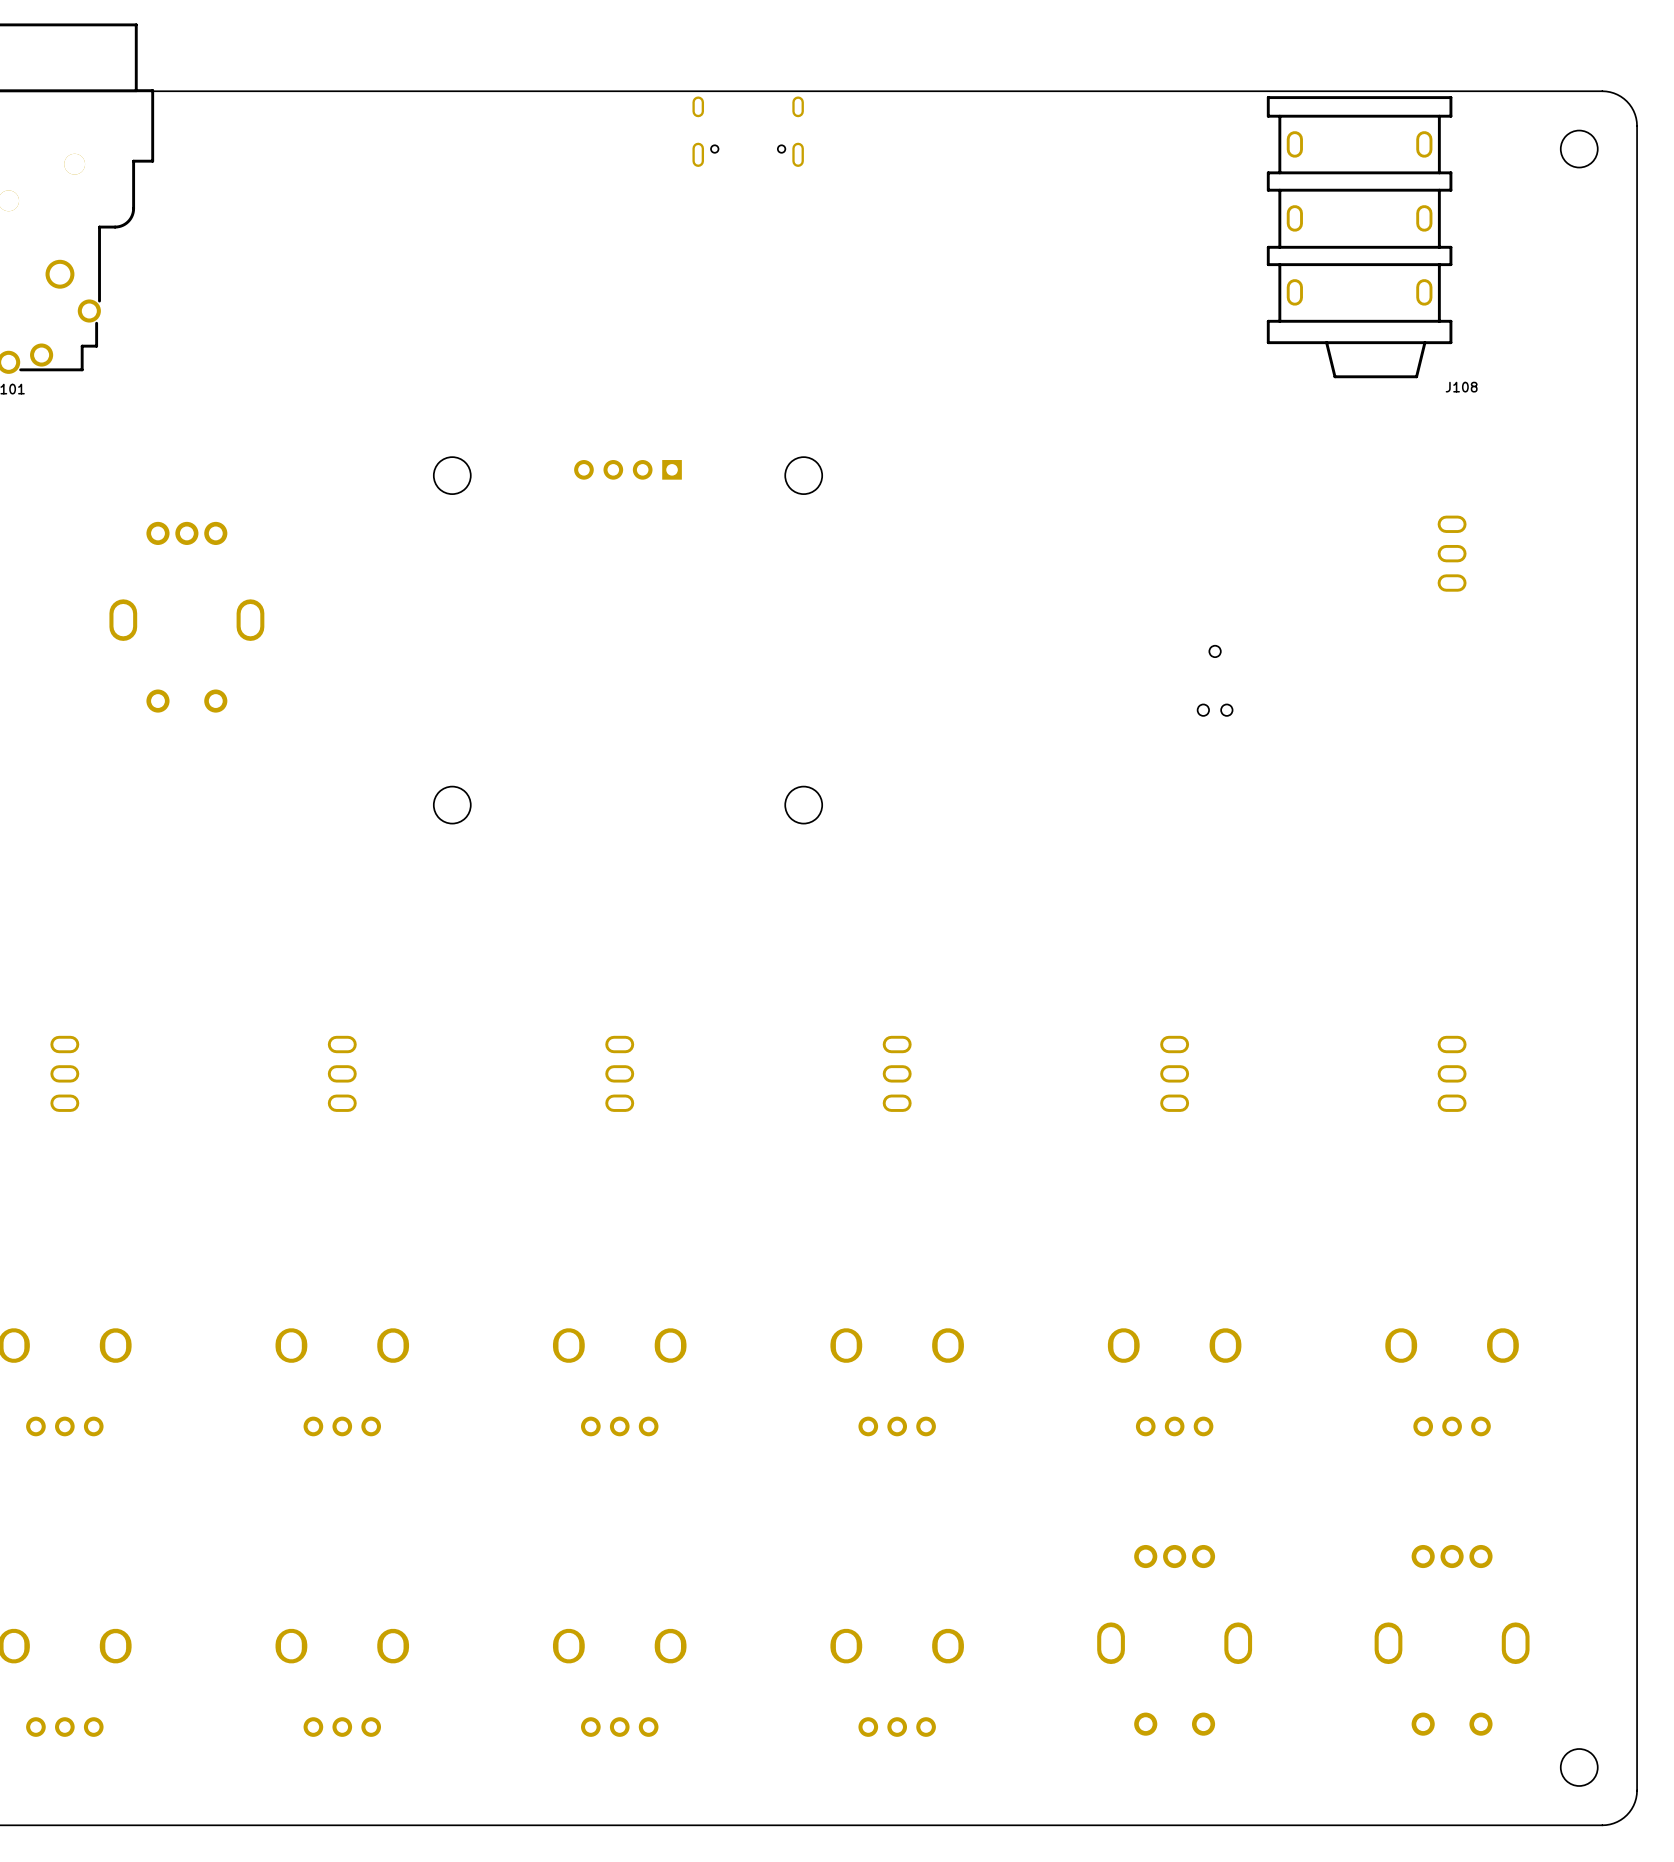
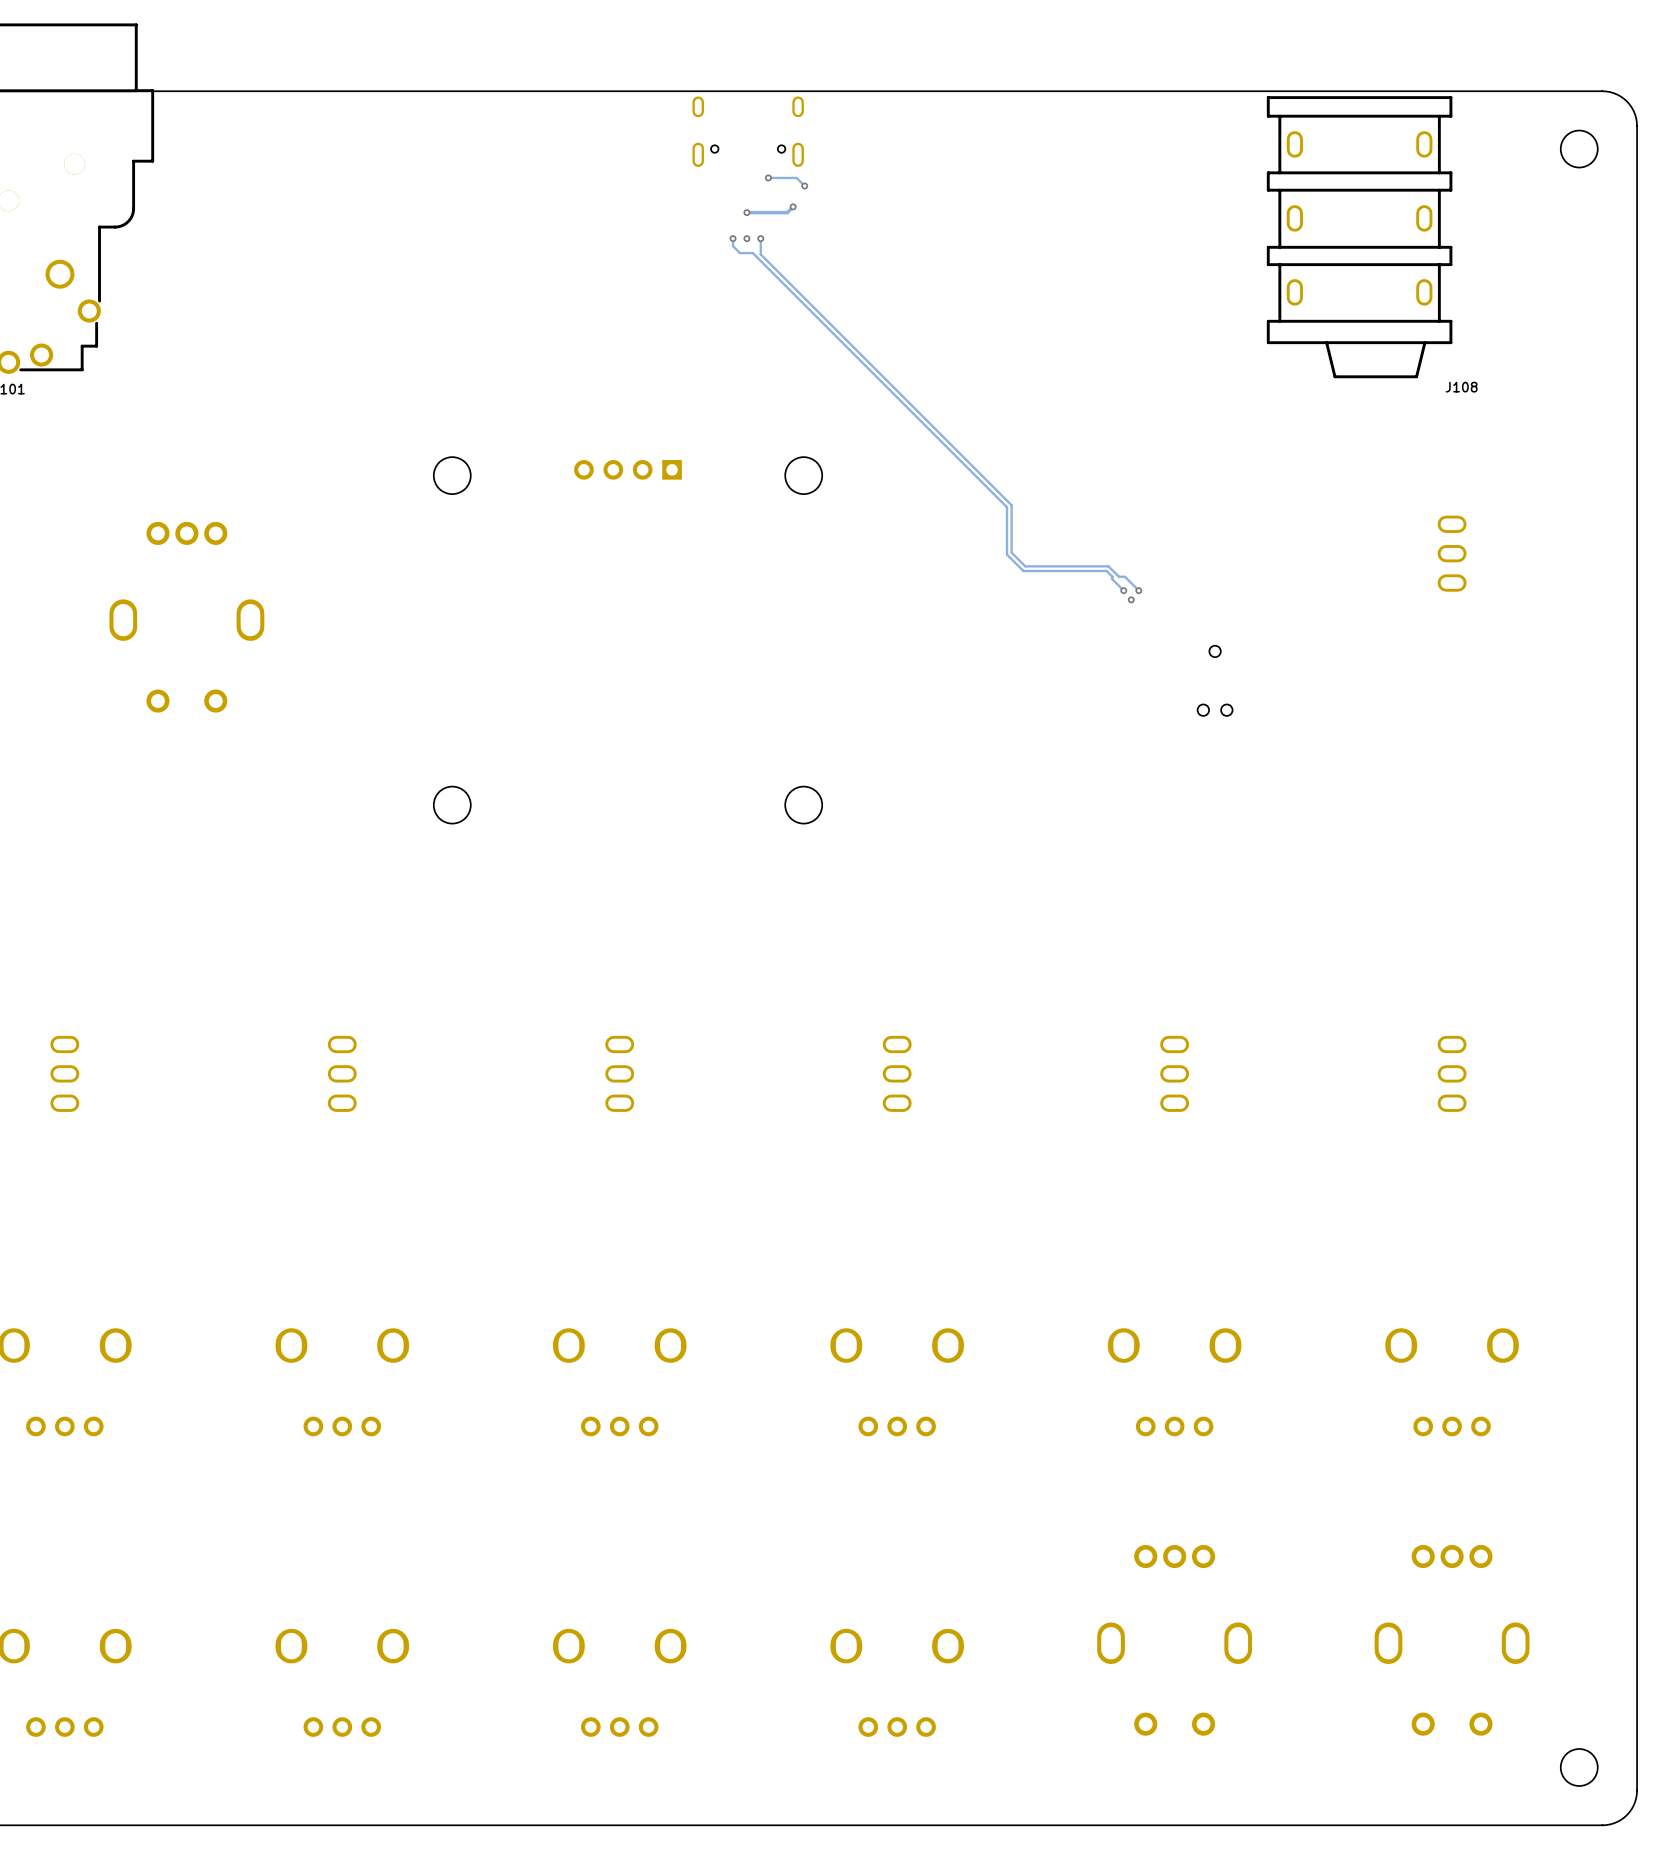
track: none -> (768, 177) (796, 177) (804, 186)
via: none -> (768, 177)
via: none -> (804, 186)
track: none -> (793, 206) (787, 212) (746, 212)
via: none -> (793, 206)
via: none -> (746, 212)
track: none -> (733, 238) (733, 246) (739, 253) (752, 253) (1007, 507) (1007, 554) (1023, 571) (1106, 571) (1123, 590)
via: none -> (733, 238)
via: none -> (746, 238)
track: none -> (760, 238) (760, 254) (1011, 505) (1011, 552) (1025, 566) (1108, 566) (1118, 576) (1124, 576) (1138, 590)
via: none -> (760, 238)
via: none -> (1123, 590)
via: none -> (1138, 590)
via: none -> (1131, 599)

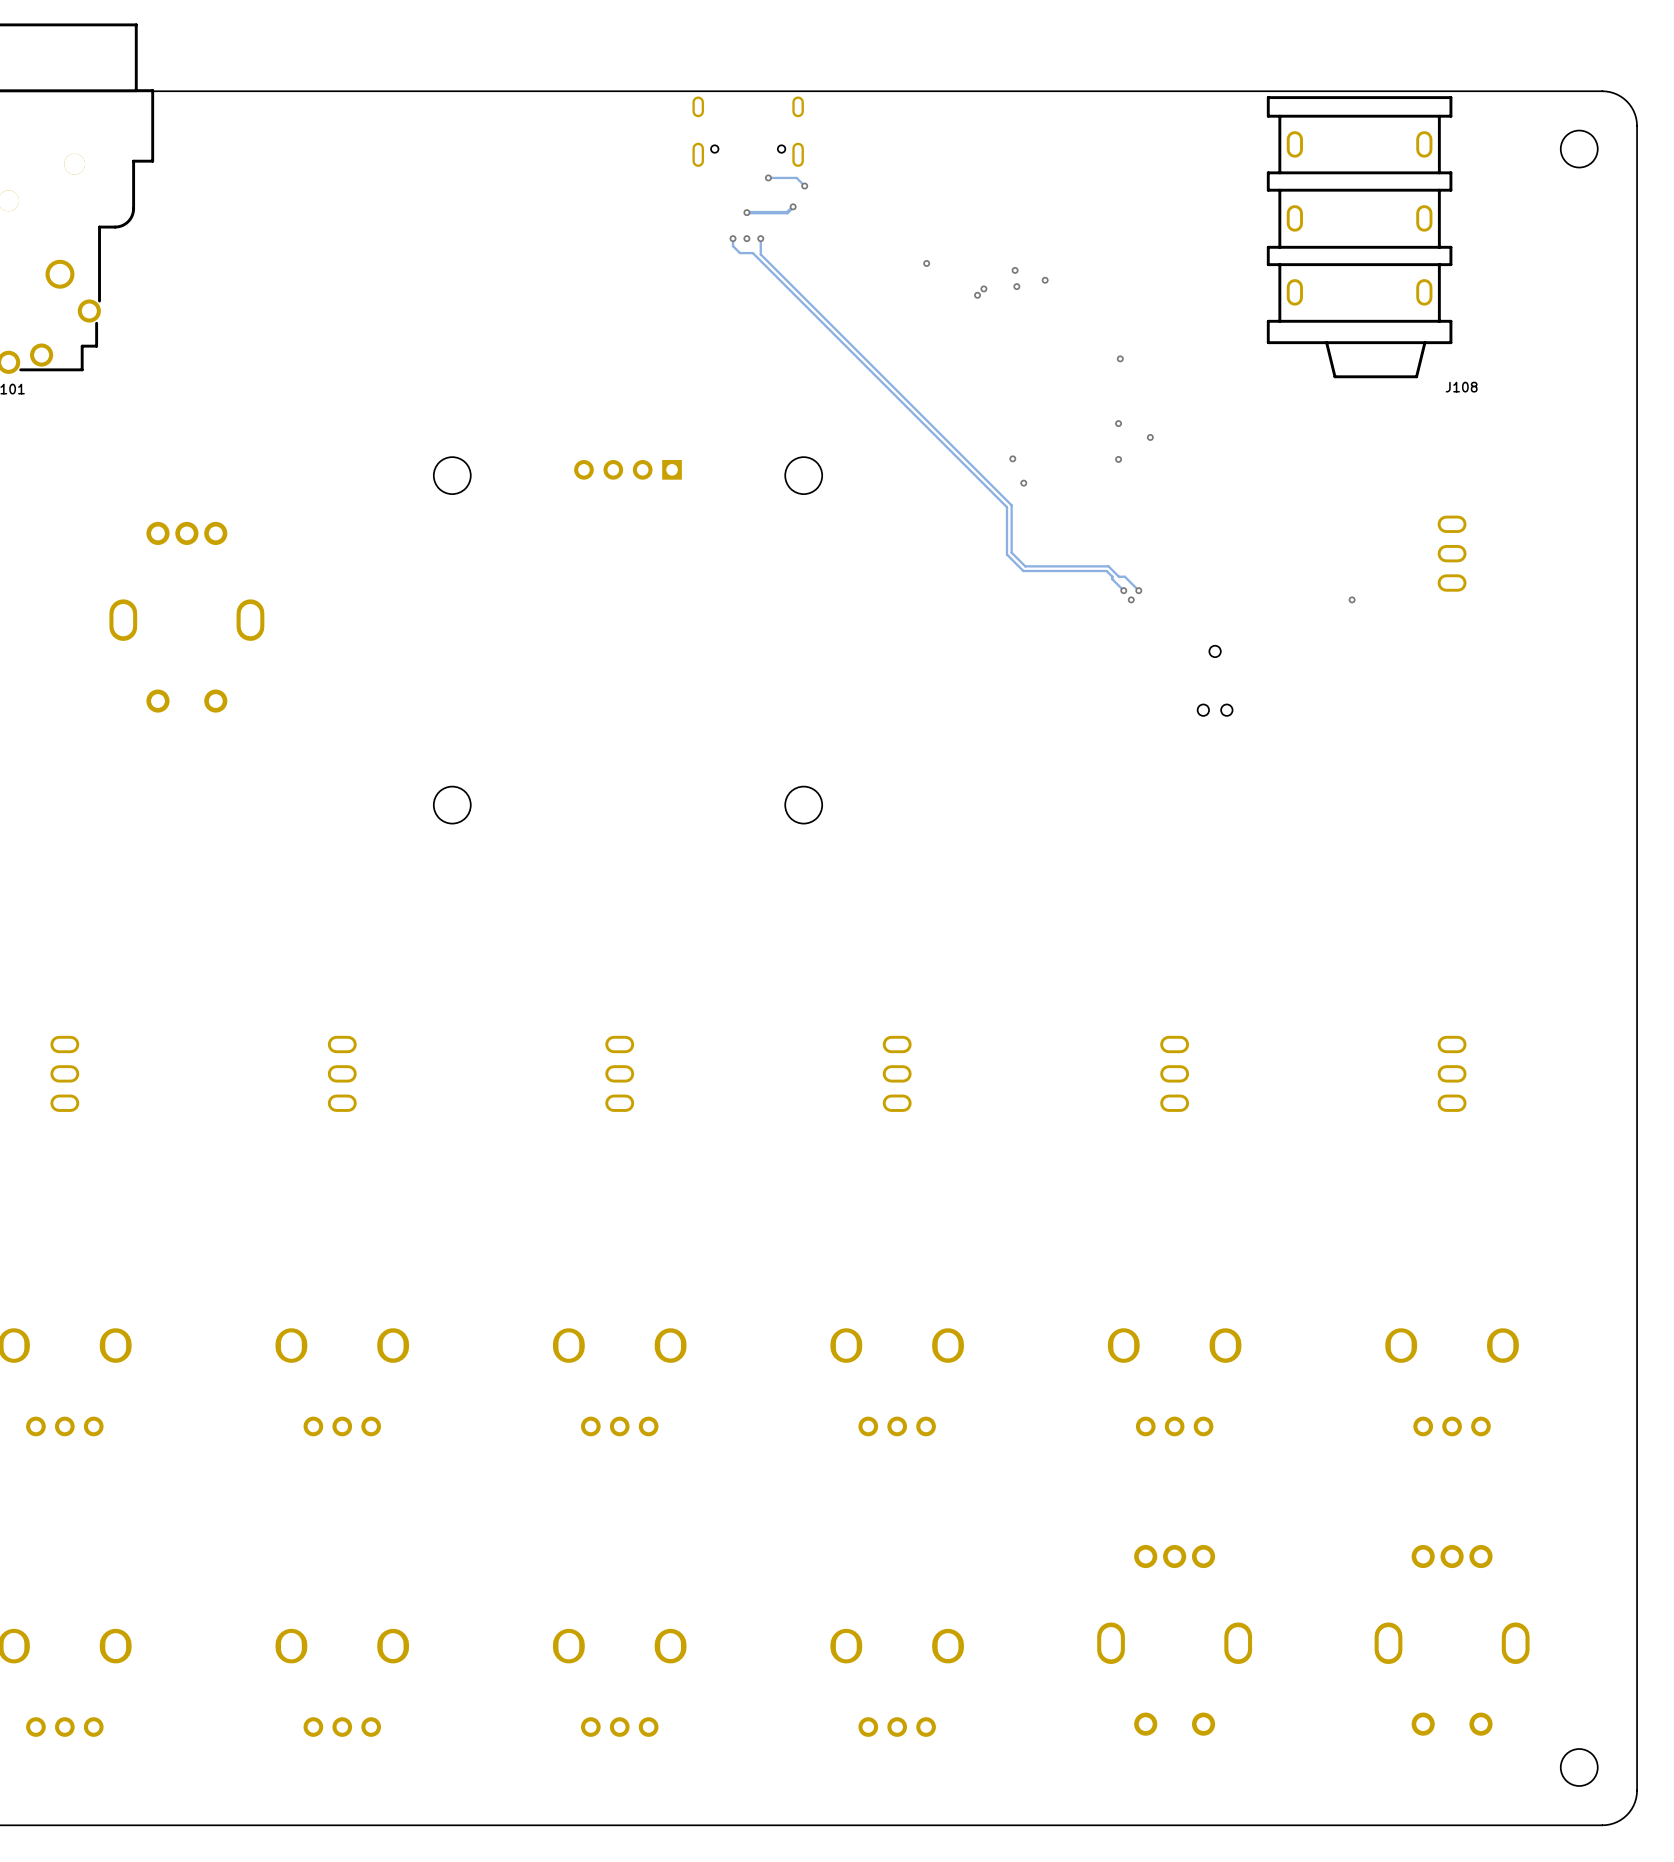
via: none -> (926, 263)
via: none -> (1015, 270)
via: none -> (1045, 280)
via: none -> (1016, 286)
via: none -> (983, 288)
via: none -> (977, 295)
via: none -> (1120, 358)
via: none -> (1118, 423)
via: none -> (1150, 437)
via: none -> (1012, 458)
via: none -> (1118, 459)
via: none -> (1023, 483)
via: none -> (1352, 599)

